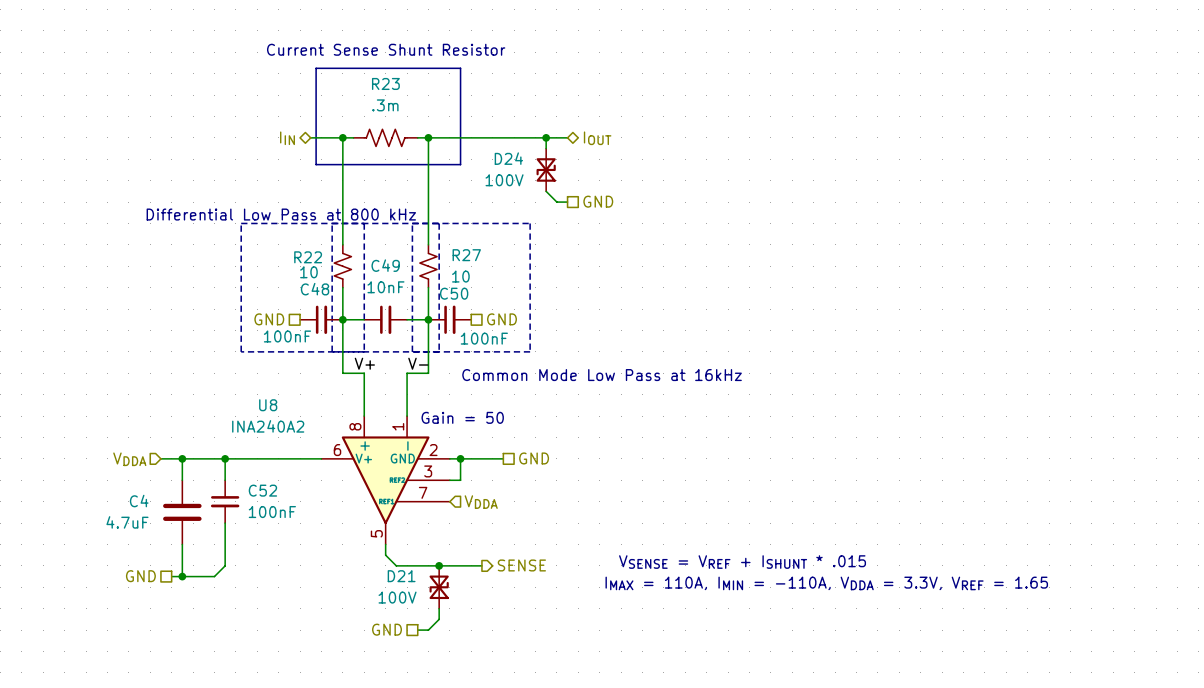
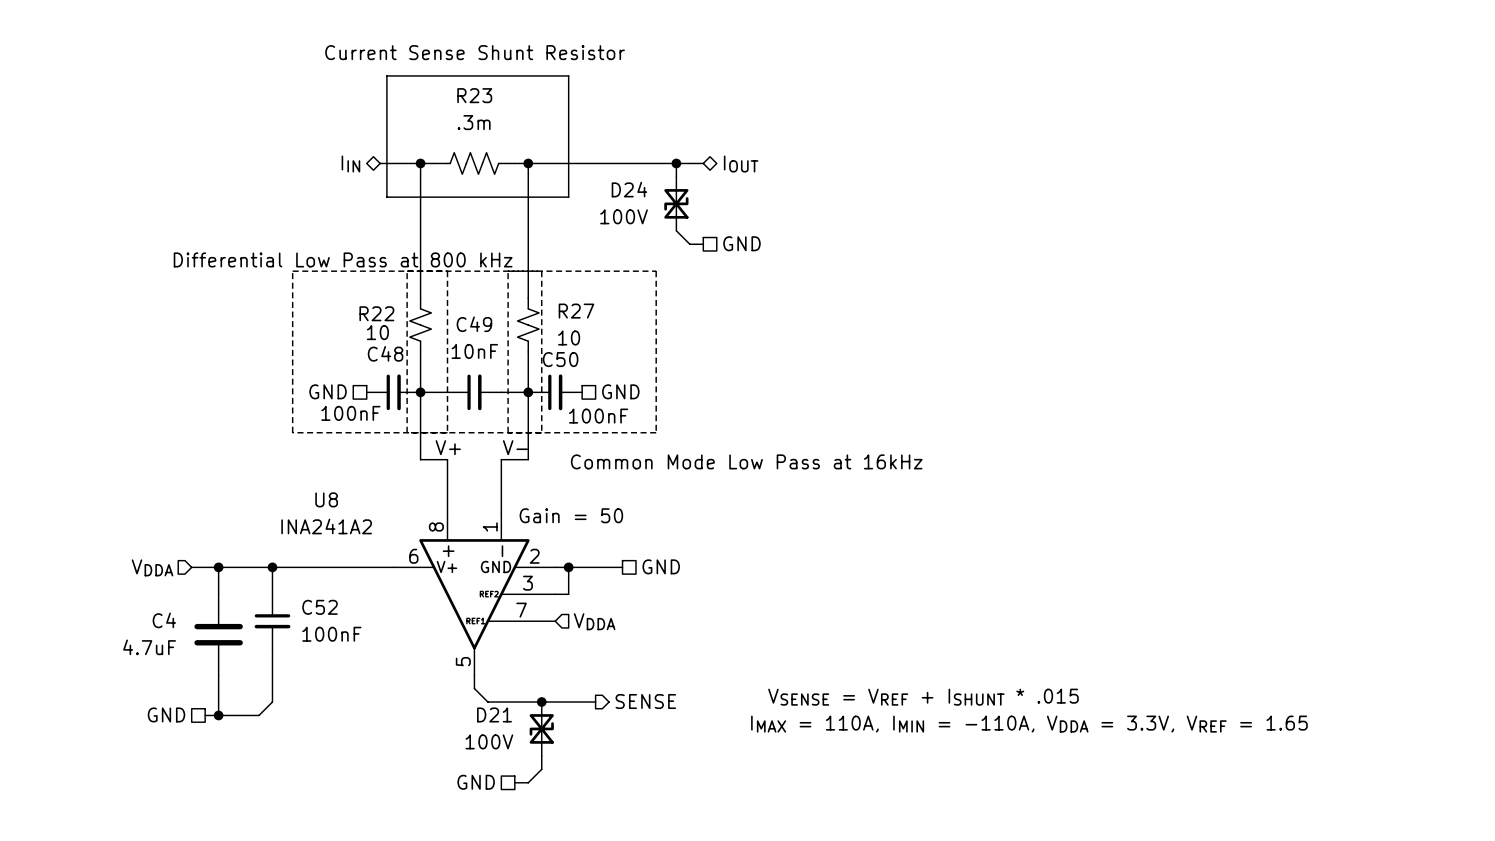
U8 value: INA240A2 (268, 426) -> INA241A2 (326, 526)

